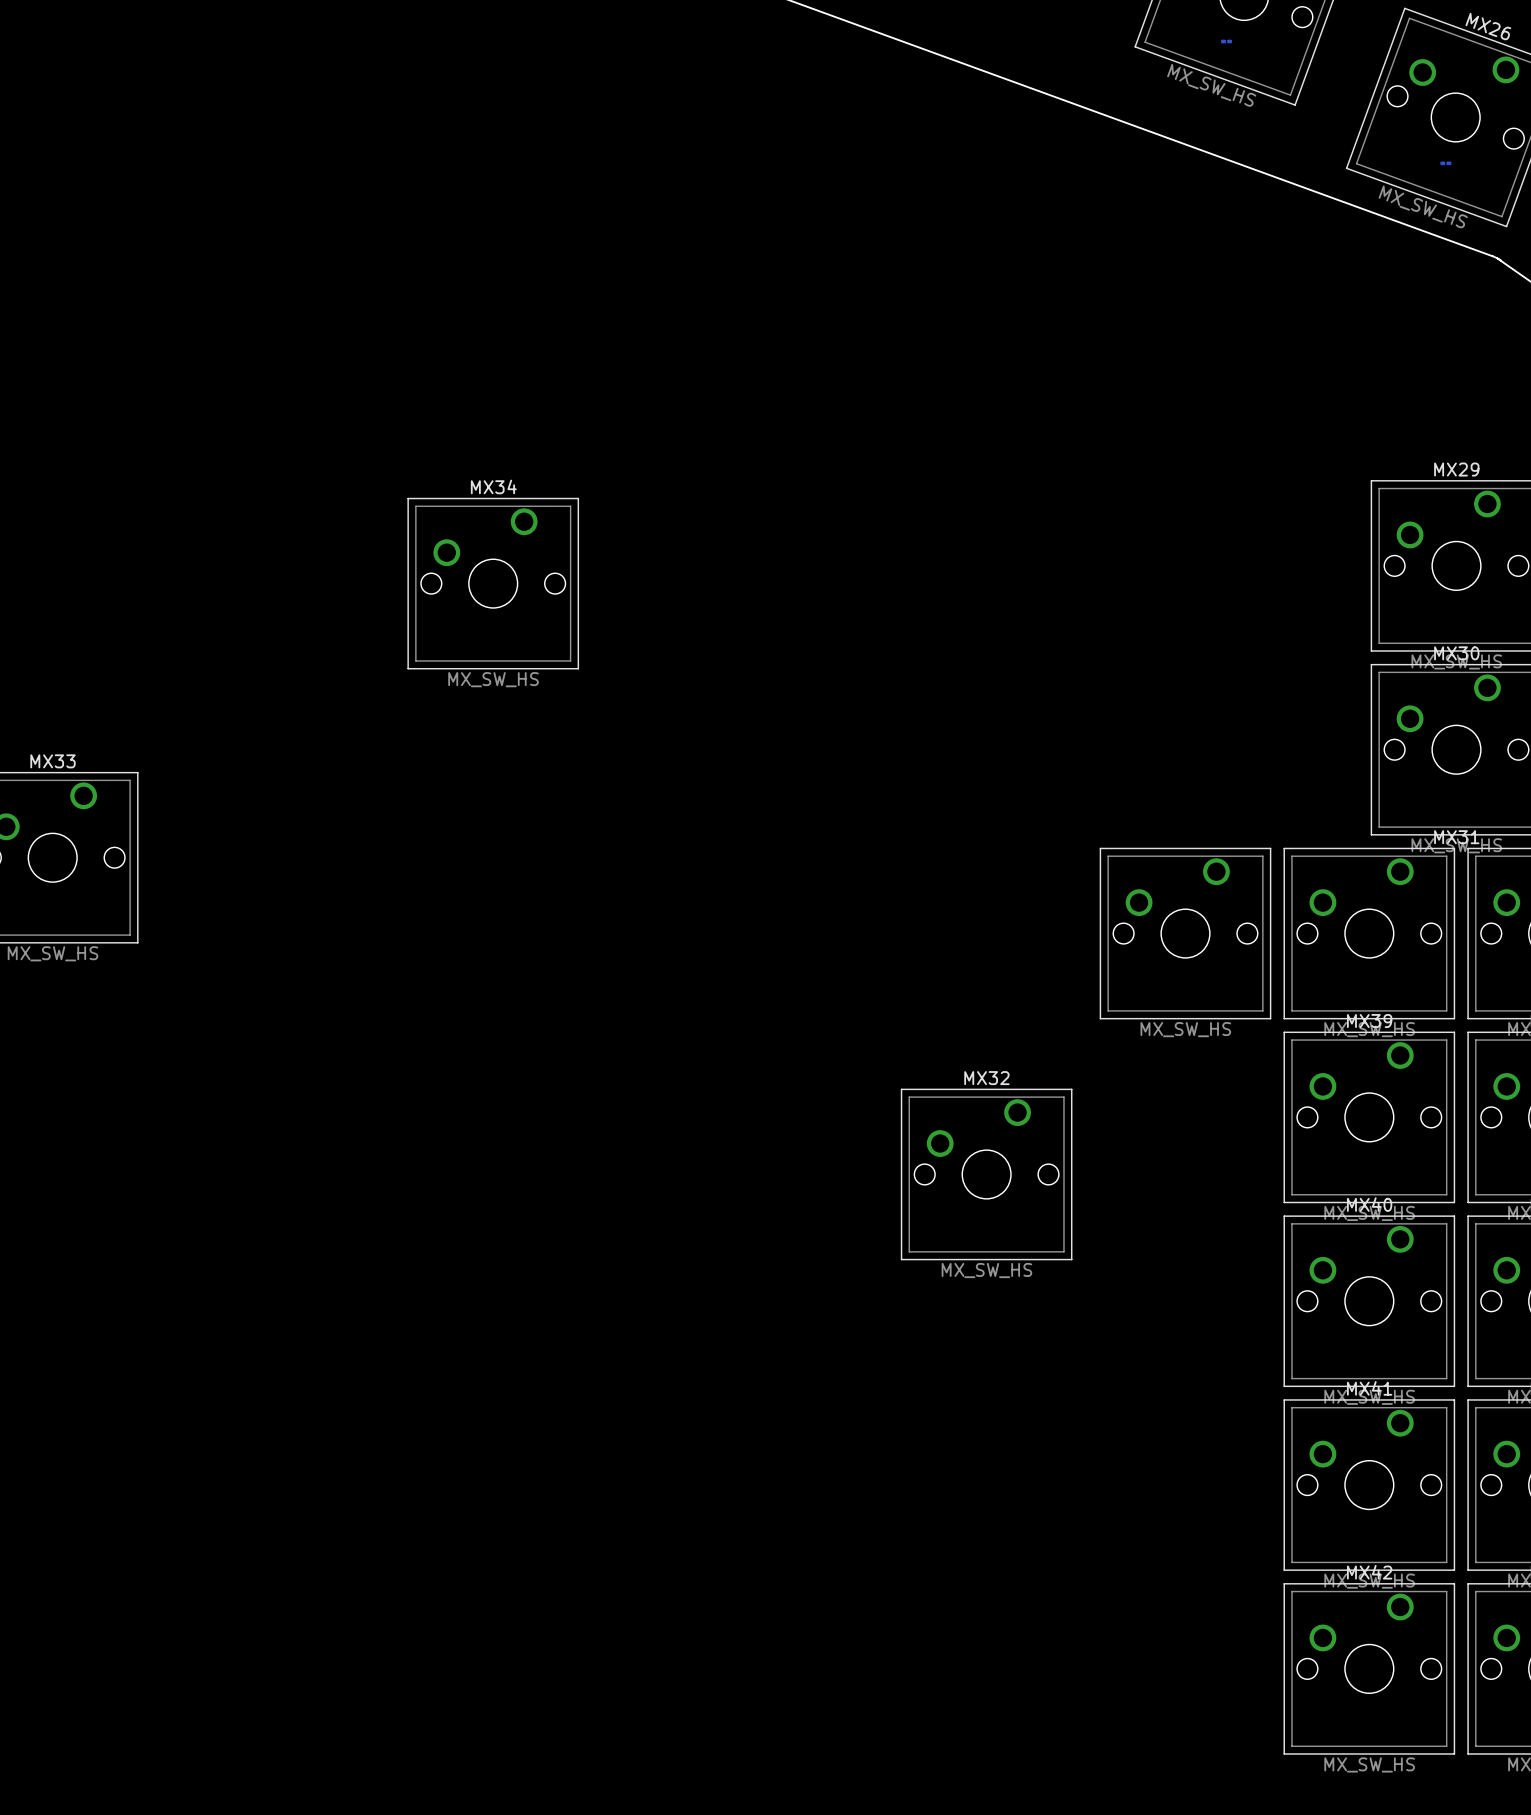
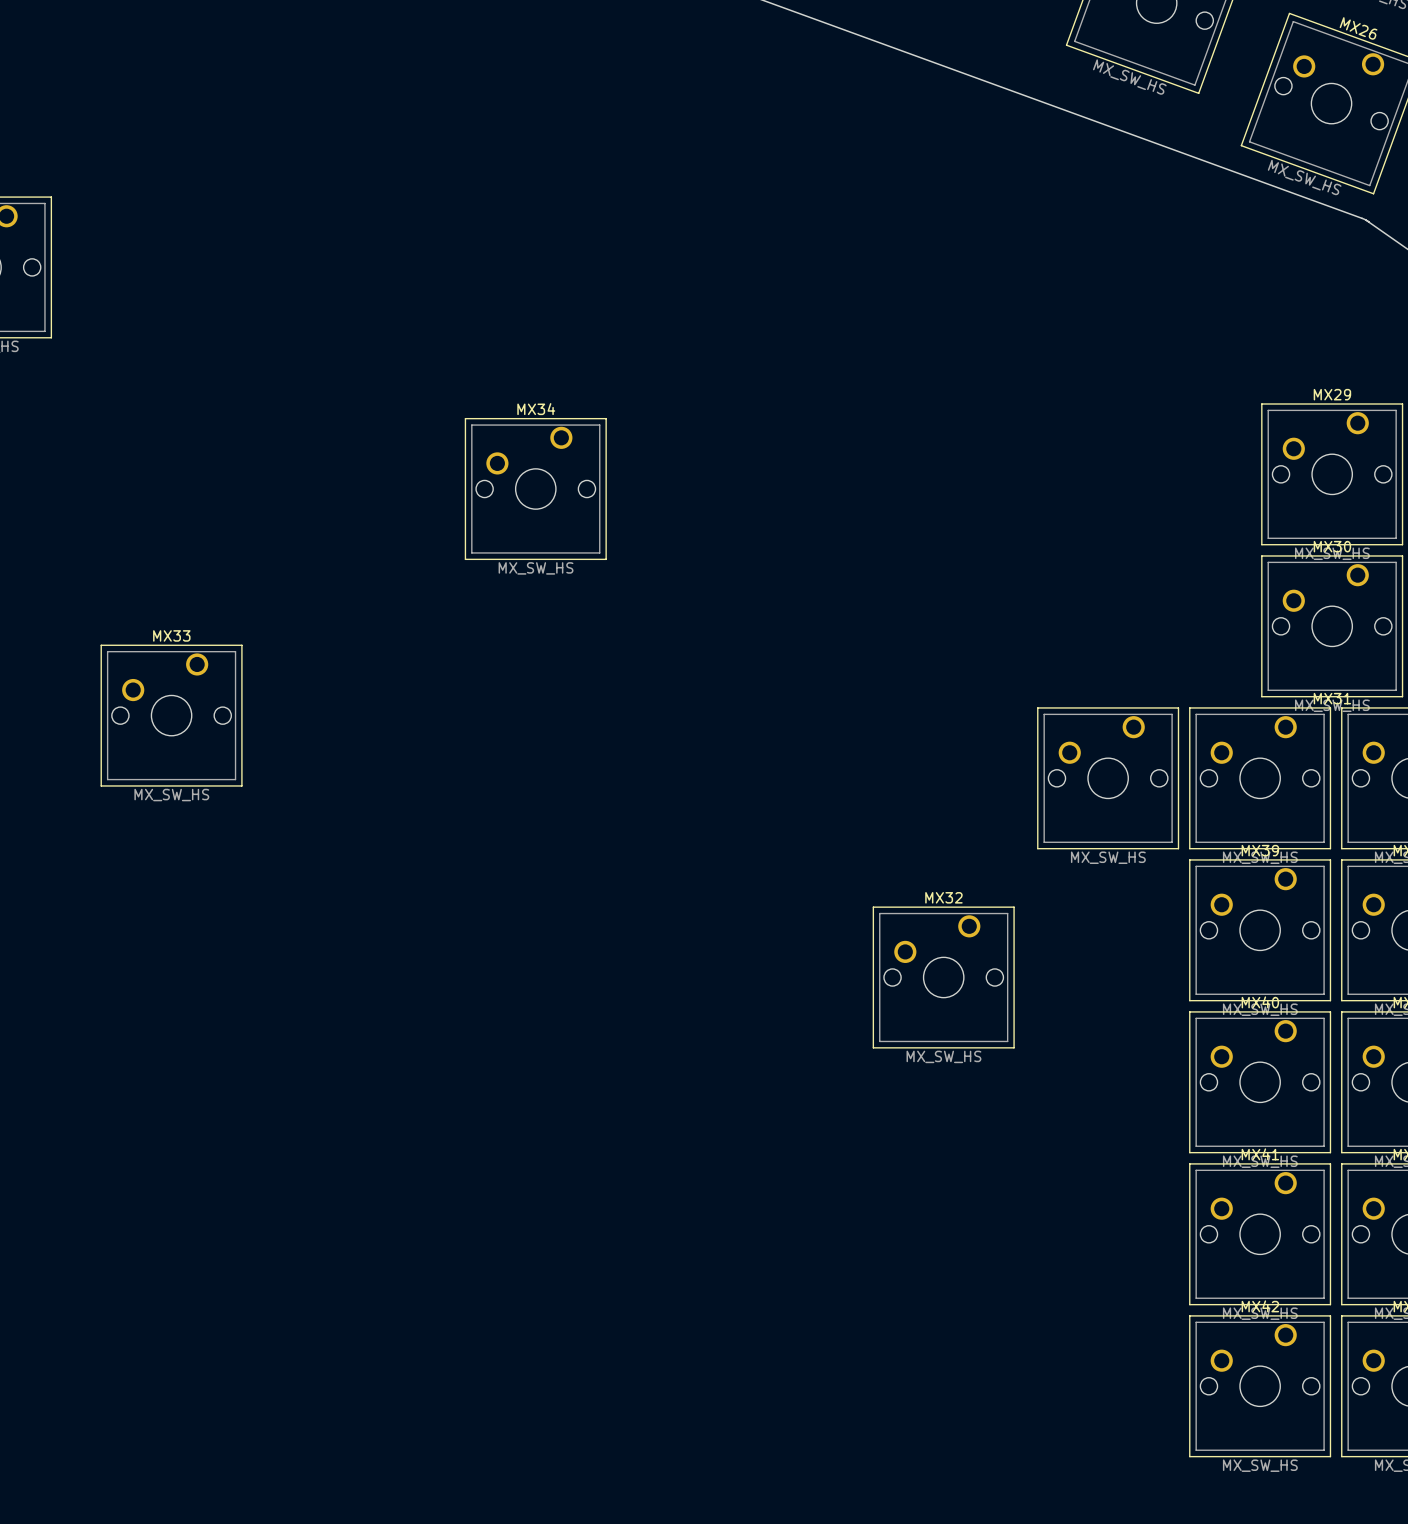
part: (1226, 41) -> none
part: (1445, 163) -> none

